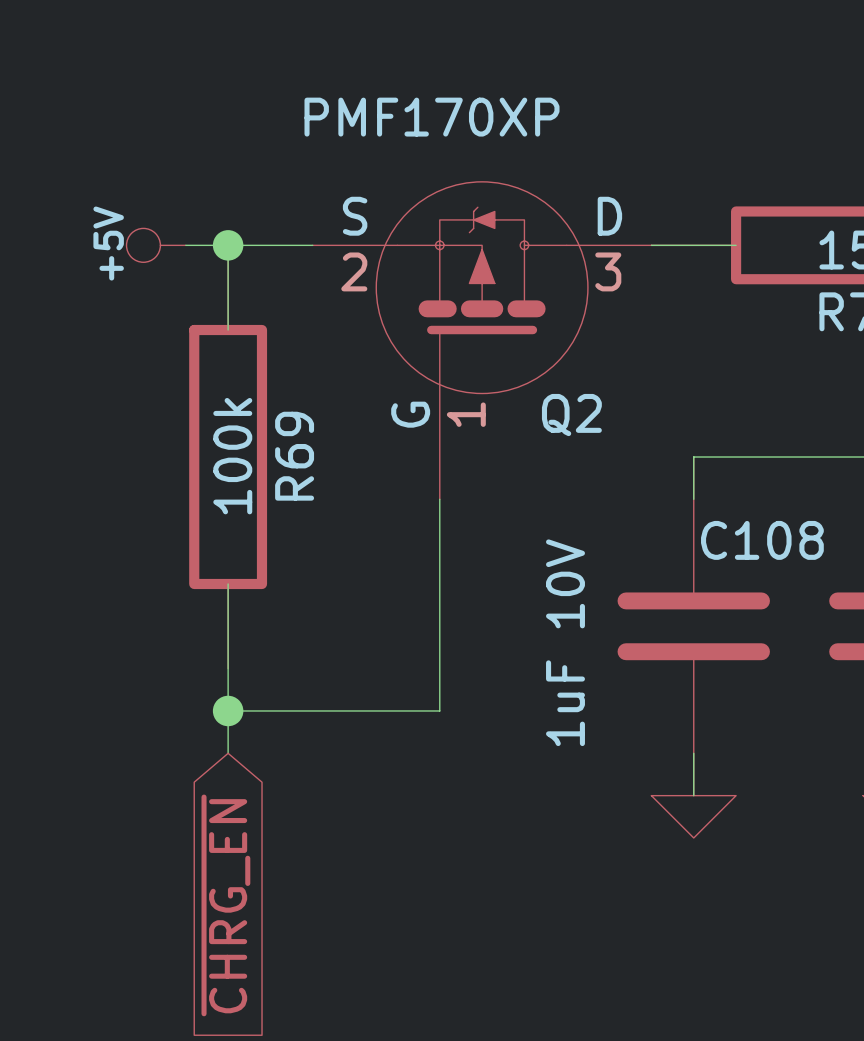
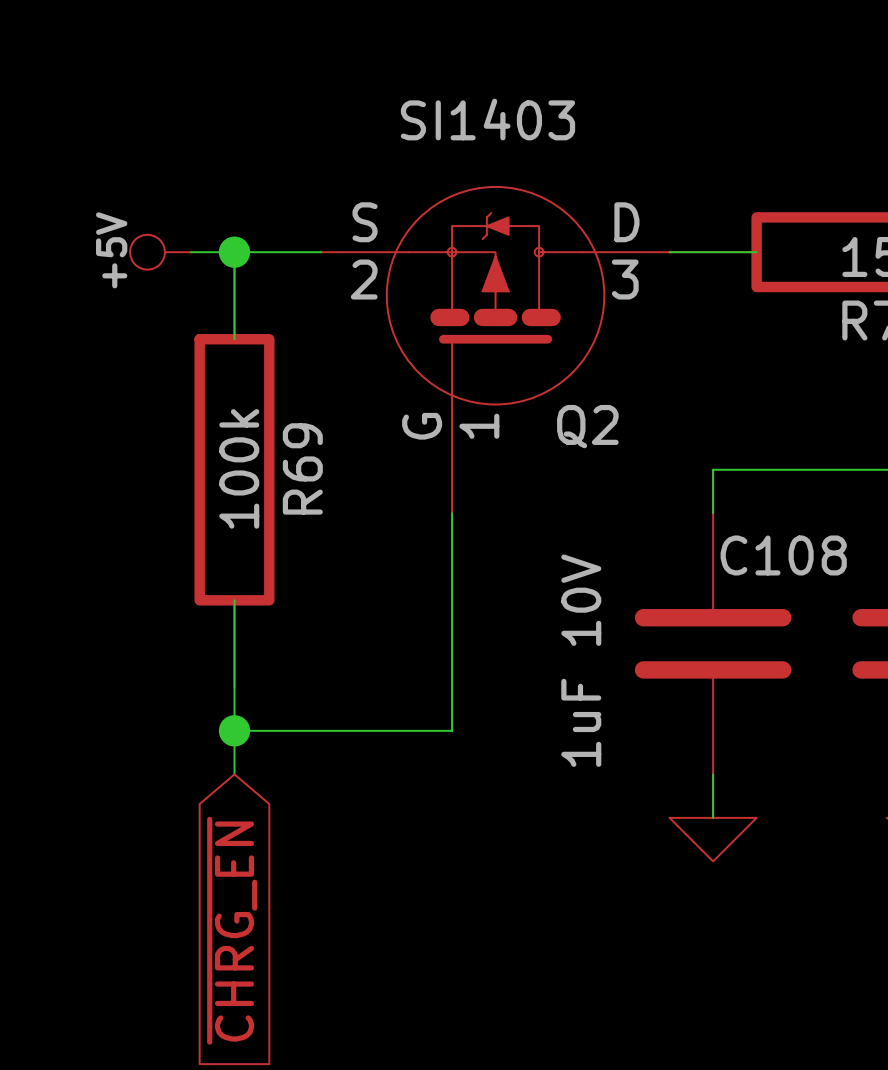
Q2 value: PMF170XP (432, 117) -> SI1403 (487, 119)

